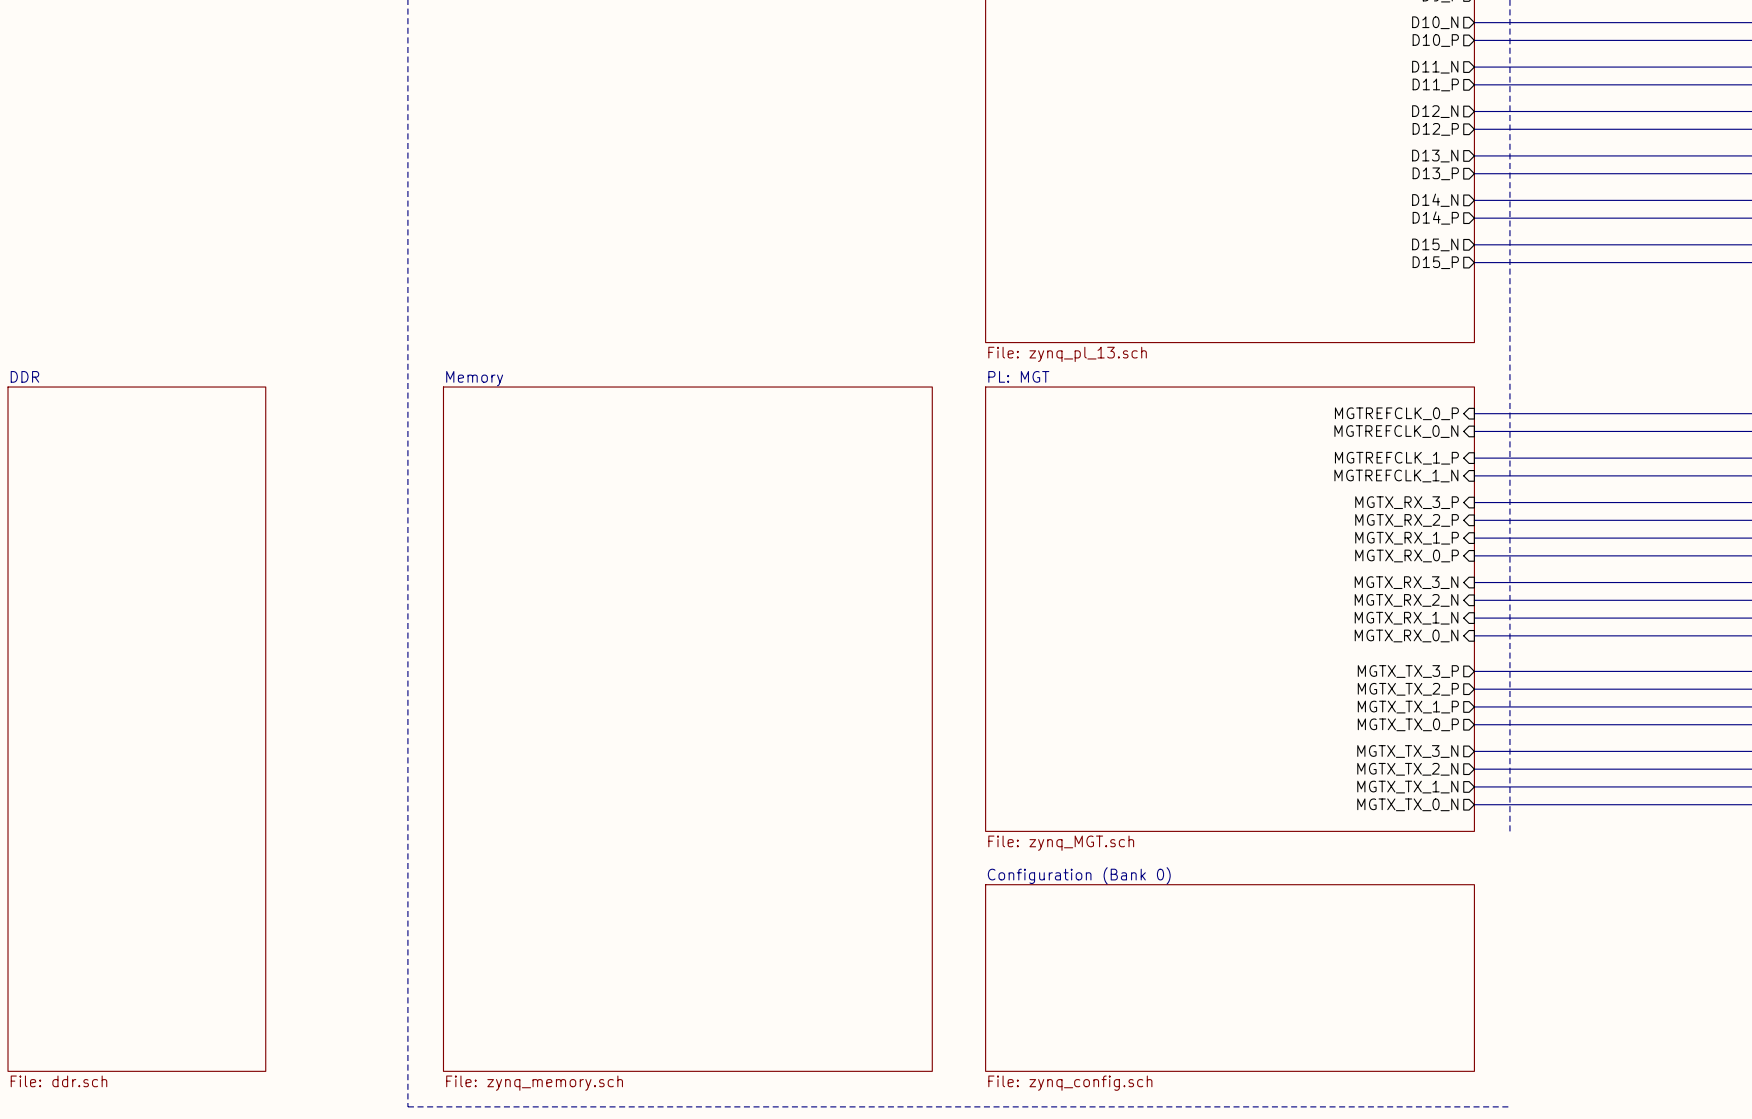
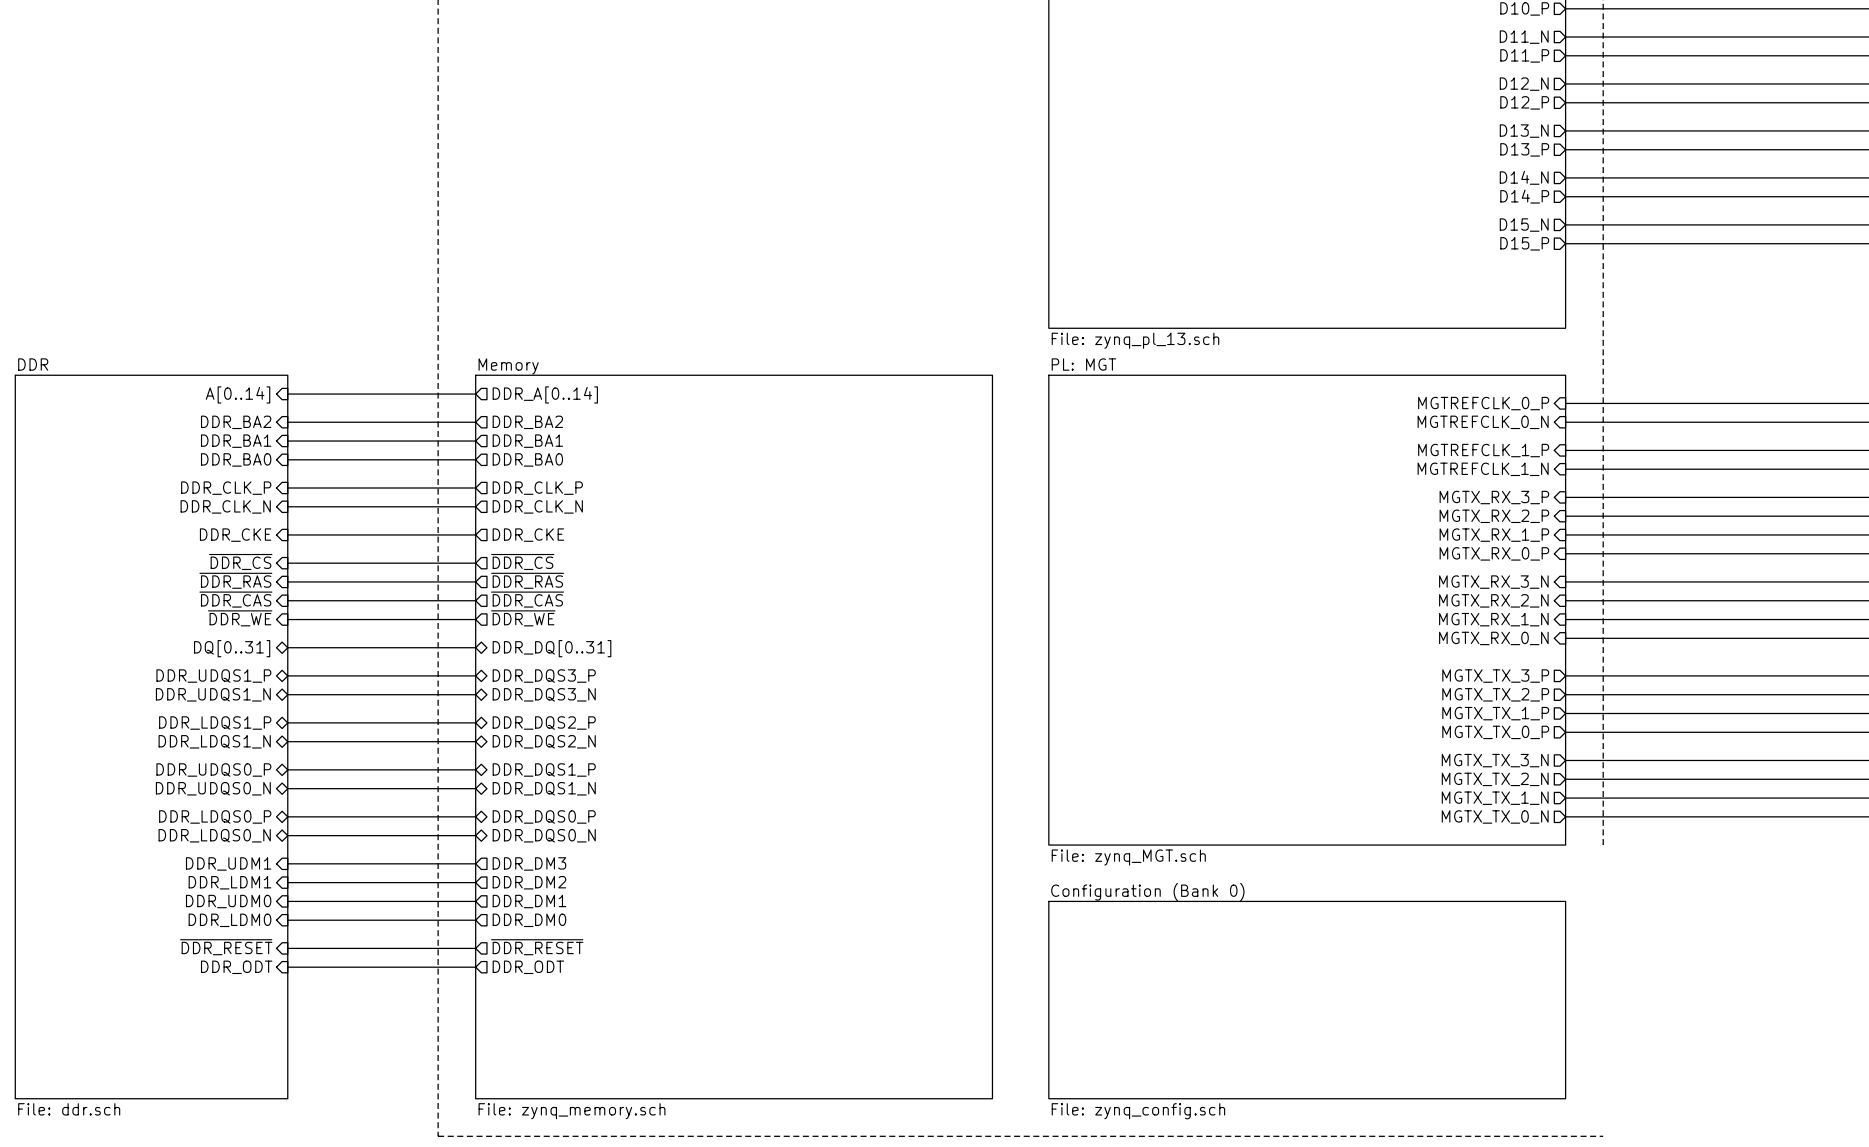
bus: none -> (287, 394) (475, 394)
sheet pin: none -> A[0..14] (238, 394)
sheet pin: none -> DDR_A[0..14] (545, 394)
sheet pin: none -> DDR_BA2 (236, 422)
wire: none -> (287, 422) (475, 422)
sheet pin: none -> DDR_BA2 (527, 422)
sheet pin: none -> DDR_BA1 (236, 441)
wire: none -> (287, 441) (475, 441)
sheet pin: none -> DDR_BA1 (527, 441)
sheet pin: none -> DDR_BA0 (236, 459)
wire: none -> (287, 459) (475, 459)
sheet pin: none -> DDR_BA0 (527, 459)
sheet pin: none -> DDR_CLK_P (226, 488)
wire: none -> (287, 488) (475, 488)
sheet pin: none -> DDR_CLK_P (537, 488)
sheet pin: none -> DDR_CLK_N (225, 506)
wire: none -> (287, 506) (475, 506)
sheet pin: none -> DDR_CLK_N (537, 506)
sheet pin: none -> DDR_CKE (235, 535)
wire: none -> (287, 534) (475, 534)
sheet pin: none -> DDR_CKE (528, 535)
sheet pin: none -> ~{DDR_CS} (240, 561)
sheet pin: none -> ~{DDR_CS} (522, 561)
wire: none -> (287, 563) (475, 563)
sheet pin: none -> ~{DDR_RAS} (235, 580)
sheet pin: none -> ~{DDR_RAS} (527, 580)
wire: none -> (287, 581) (475, 581)
sheet pin: none -> ~{DDR_CAS} (235, 599)
sheet pin: none -> ~{DDR_CAS} (527, 599)
wire: none -> (287, 600) (475, 600)
sheet pin: none -> ~{DDR_WE} (240, 618)
sheet pin: none -> ~{DDR_WE} (523, 618)
wire: none -> (287, 619) (475, 619)
bus: none -> (287, 647) (475, 647)
sheet pin: none -> DQ[0..31] (232, 648)
sheet pin: none -> DDR_DQ[0..31] (552, 648)
sheet pin: none -> DDR_UDQS1_P (213, 676)
wire: none -> (287, 675) (475, 675)
sheet pin: none -> DDR_DQS3_P (544, 676)
sheet pin: none -> DDR_UDQS1_N (213, 694)
wire: none -> (287, 694) (475, 694)
sheet pin: none -> DDR_DQS3_N (544, 694)
sheet pin: none -> DDR_LDQS1_P (215, 723)
wire: none -> (287, 722) (475, 722)
sheet pin: none -> DDR_DQS2_P (544, 723)
sheet pin: none -> DDR_LDQS1_N (214, 741)
wire: none -> (287, 741) (475, 741)
sheet pin: none -> DDR_DQS2_N (544, 741)
sheet pin: none -> DDR_UDQS0_P (213, 769)
wire: none -> (287, 769) (475, 769)
sheet pin: none -> DDR_DQS1_P (544, 769)
sheet pin: none -> DDR_UDQS0_N (213, 788)
wire: none -> (287, 788) (475, 788)
sheet pin: none -> DDR_DQS1_N (544, 788)
sheet pin: none -> DDR_LDQS0_P (215, 816)
wire: none -> (287, 816) (475, 816)
sheet pin: none -> DDR_DQS0_P (544, 816)
sheet pin: none -> DDR_LDQS0_N (214, 835)
wire: none -> (287, 835) (475, 835)
sheet pin: none -> DDR_DQS0_N (544, 835)
sheet pin: none -> DDR_UDM1 (228, 863)
wire: none -> (287, 863) (475, 863)
sheet pin: none -> DDR_DM3 (529, 863)
wire: none -> (287, 882) (475, 882)
sheet pin: none -> DDR_LDM1 (229, 882)
sheet pin: none -> DDR_DM2 (529, 882)
sheet pin: none -> DDR_UDM0 (228, 901)
wire: none -> (287, 901) (475, 901)
sheet pin: none -> DDR_DM1 (529, 901)
sheet pin: none -> DDR_LDM0 (229, 920)
wire: none -> (287, 920) (475, 920)
sheet pin: none -> DDR_DM0 (529, 920)
sheet pin: none -> ~{DDR_RESET} (226, 947)
sheet pin: none -> ~{DDR_RESET} (537, 947)
wire: none -> (287, 948) (475, 948)
wire: none -> (287, 967) (475, 967)
sheet pin: none -> DDR_ODT (236, 967)
sheet pin: none -> DDR_ODT (528, 967)

